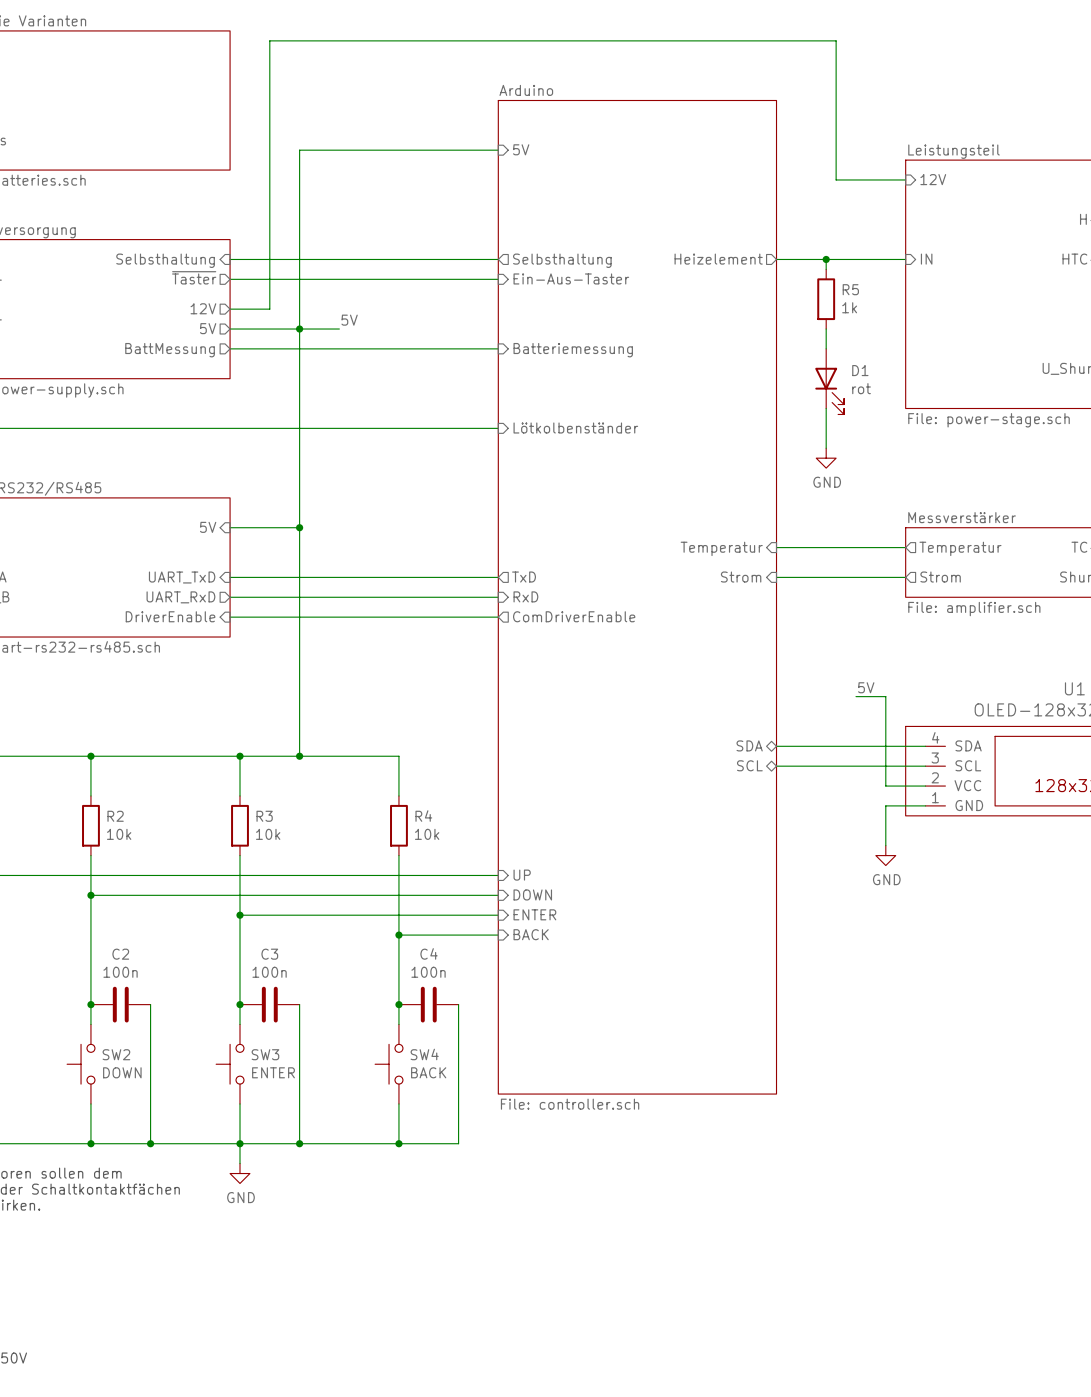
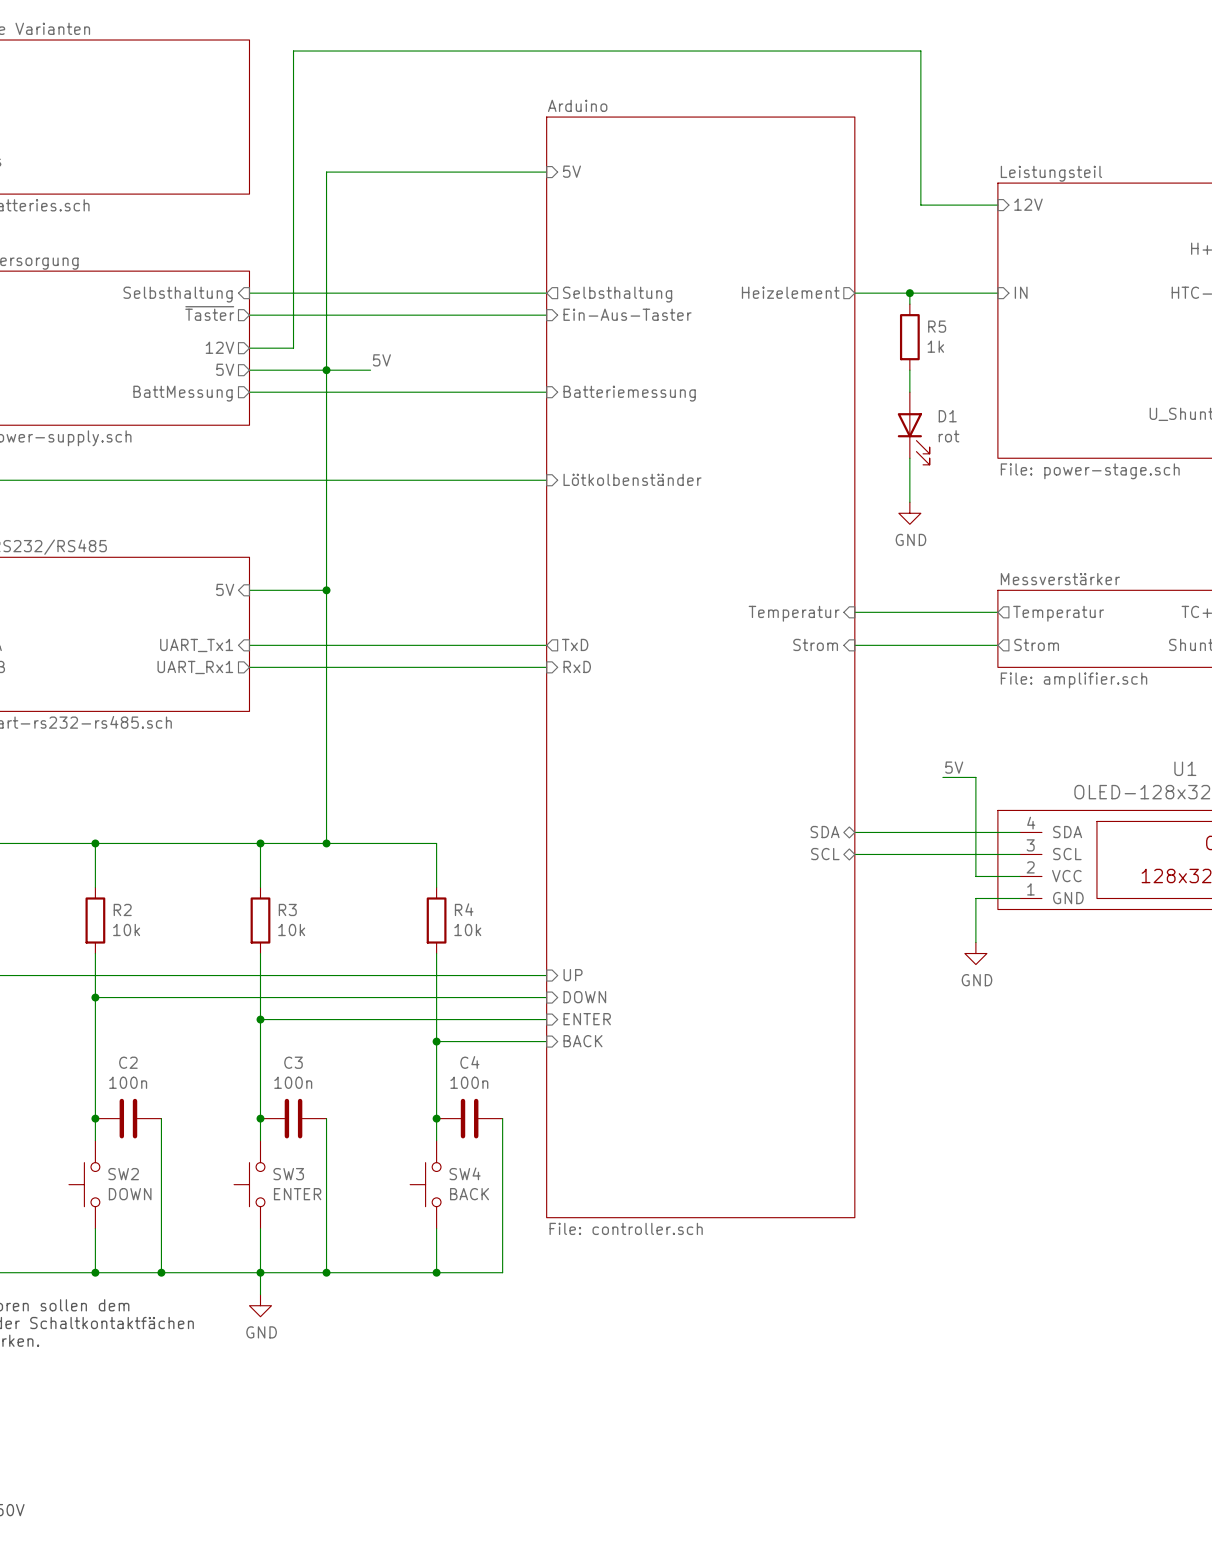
sheet pin: UART_TxD (182, 577) -> UART_Tx1 (196, 645)
sheet pin: UART_RxD (180, 597) -> UART_Rx1 (195, 667)
sheet pin: DriverEnable (170, 616) -> none
sheet pin: ComDriverEnable (574, 616) -> none
wire: (230, 617) (498, 617) -> none

